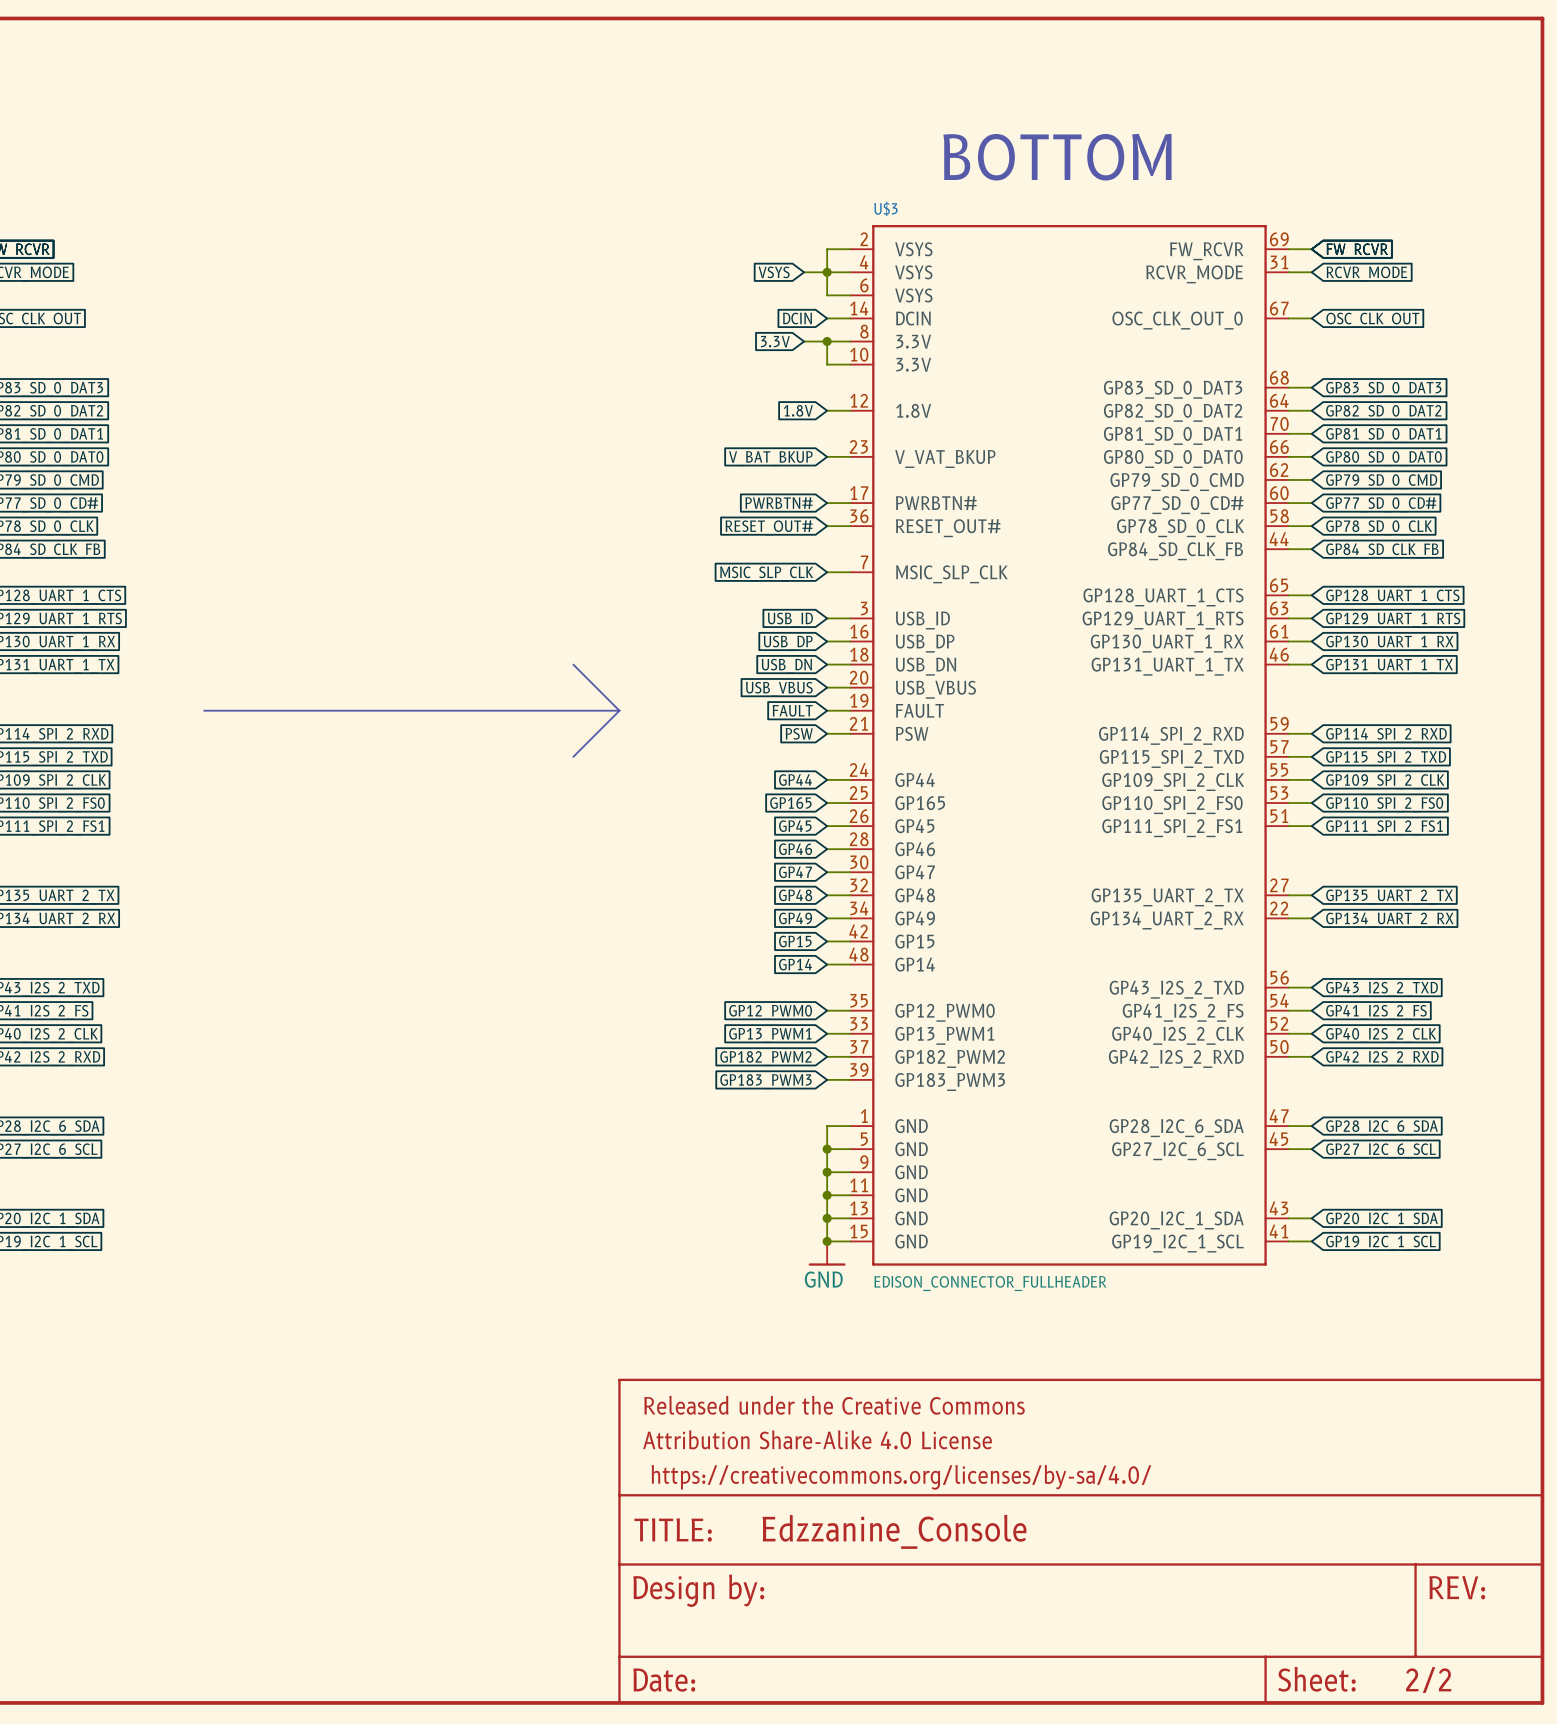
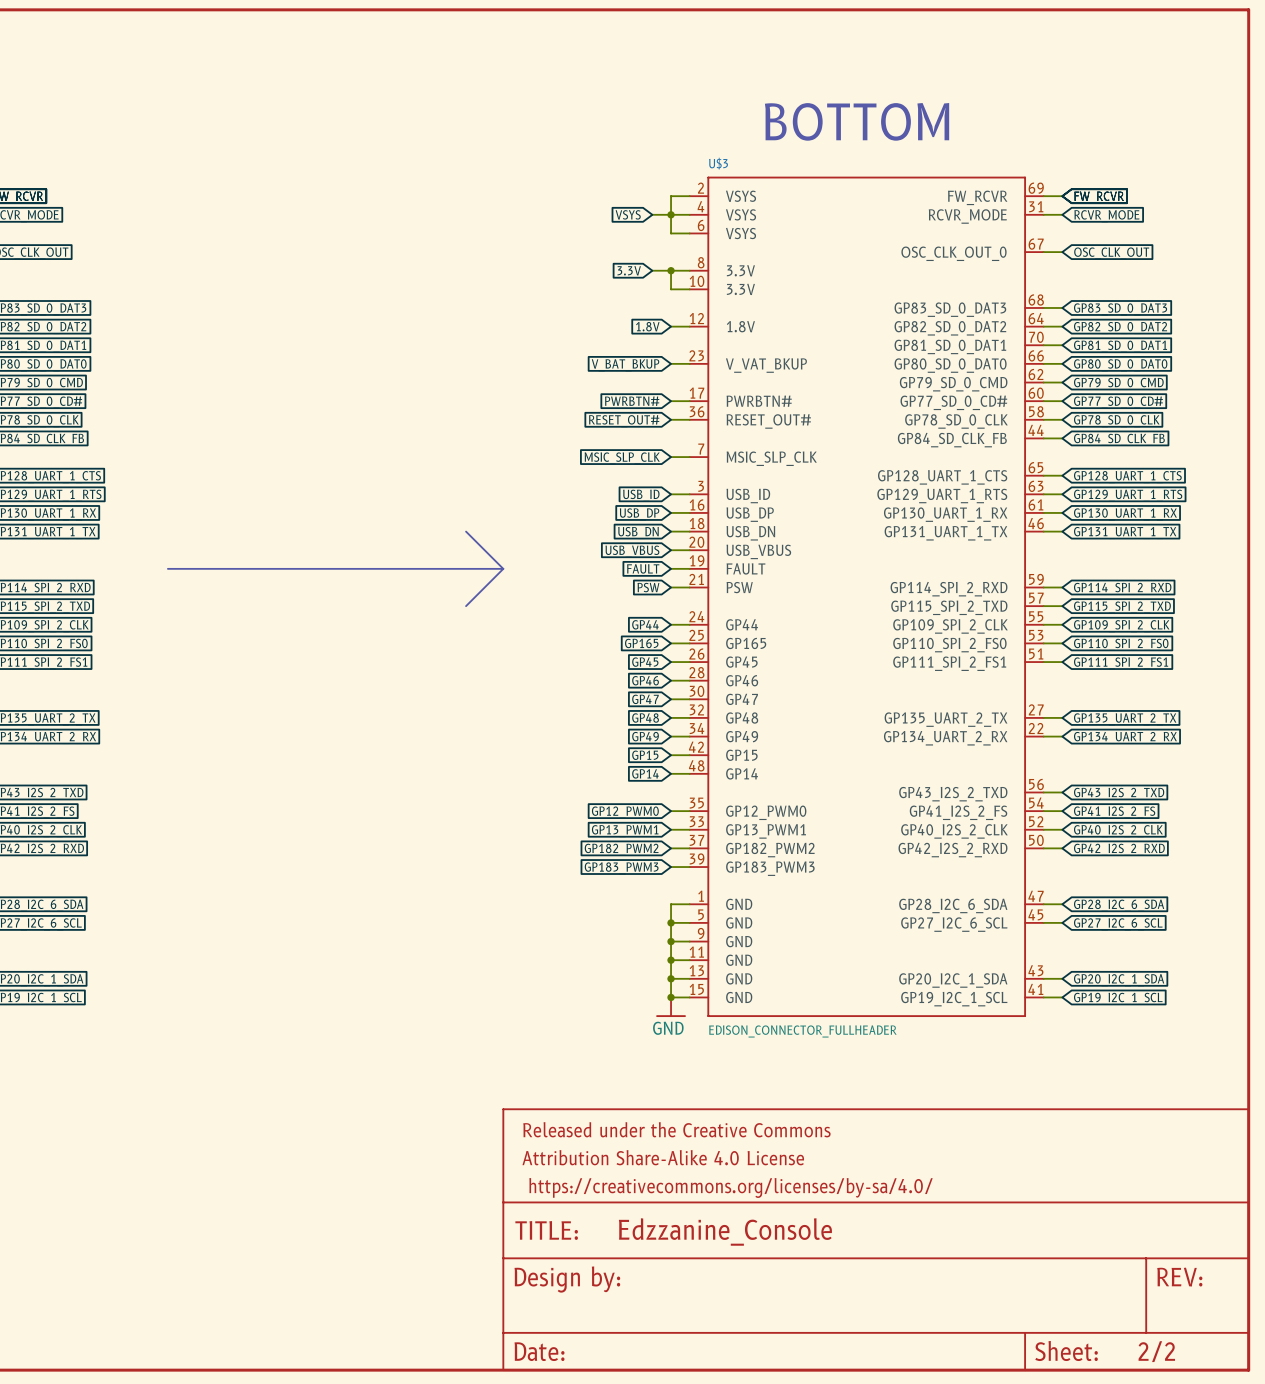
U$3 symbol: [850, 224, 1289, 1266] -> [689, 176, 1044, 1018]
global label: DCIN (797, 318) -> none
wire: (827, 318) (850, 318) -> none

